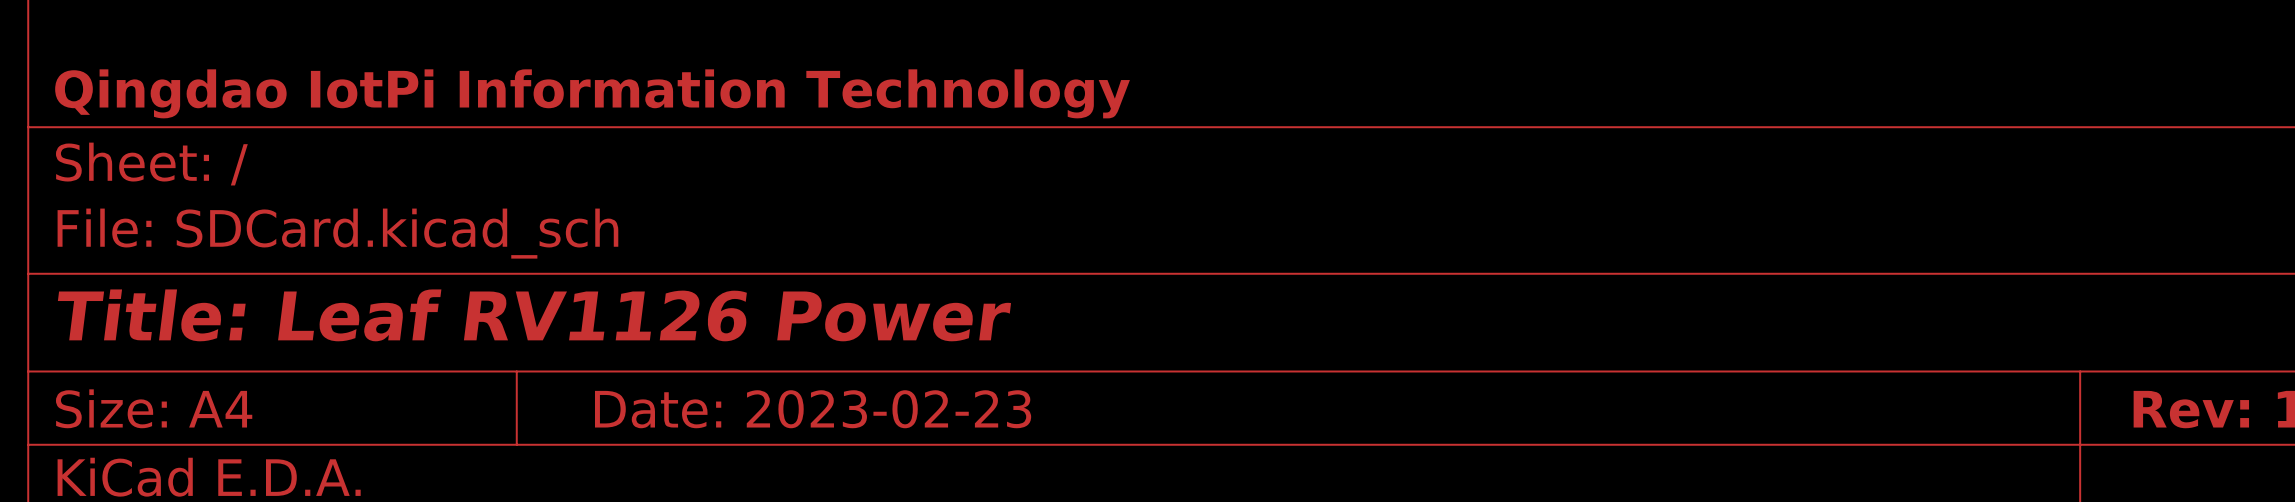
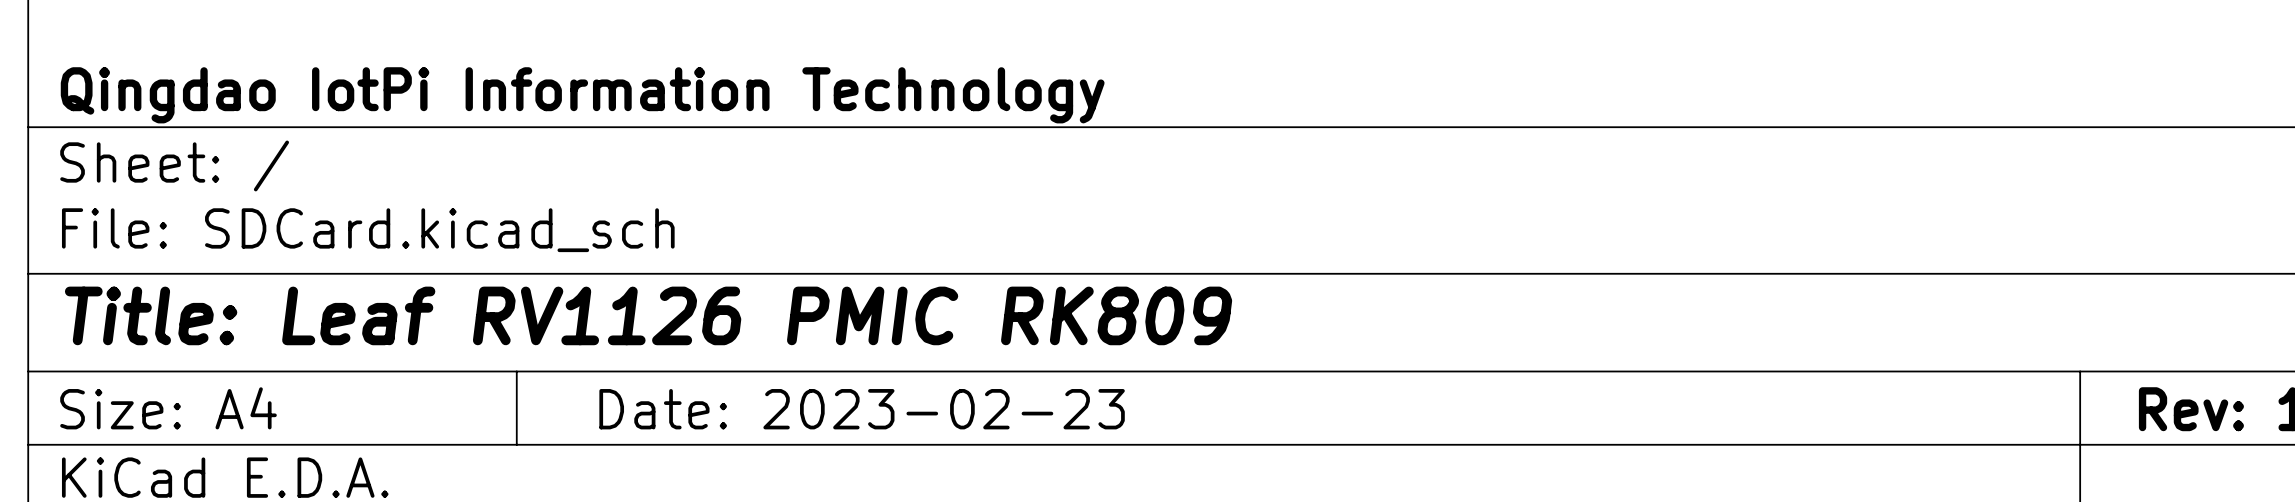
title block: Title: Leaf RV1126 Power (534, 315) -> Title: Leaf RV1126 PMIC RK809 (648, 315)

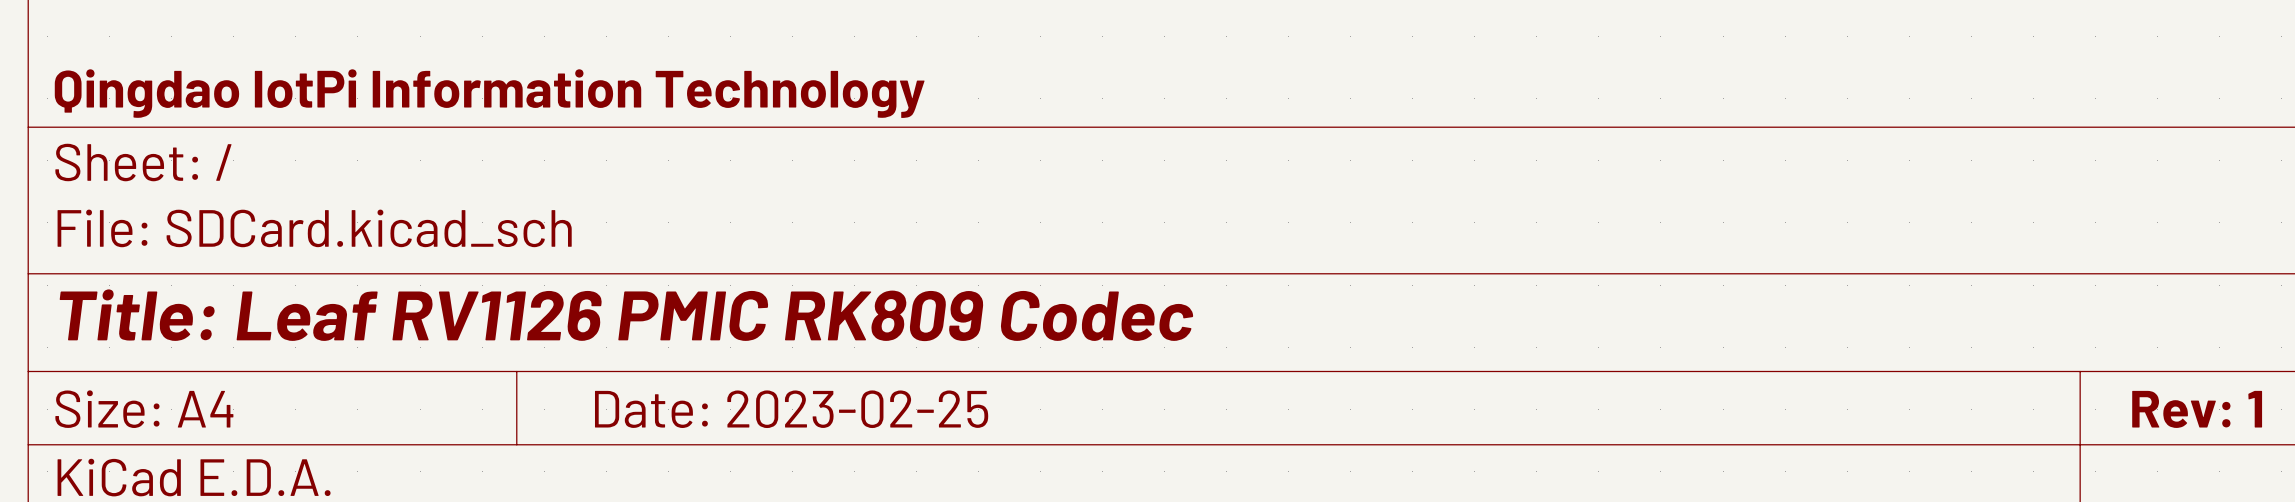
title block: Title: Leaf RV1126 PMIC RK809 (648, 315) -> Title: Leaf RV1126 PMIC RK809 Codec (626, 315)
title block: Date: 2023-02-23 (862, 409) -> Date: 2023-02-25 (791, 409)

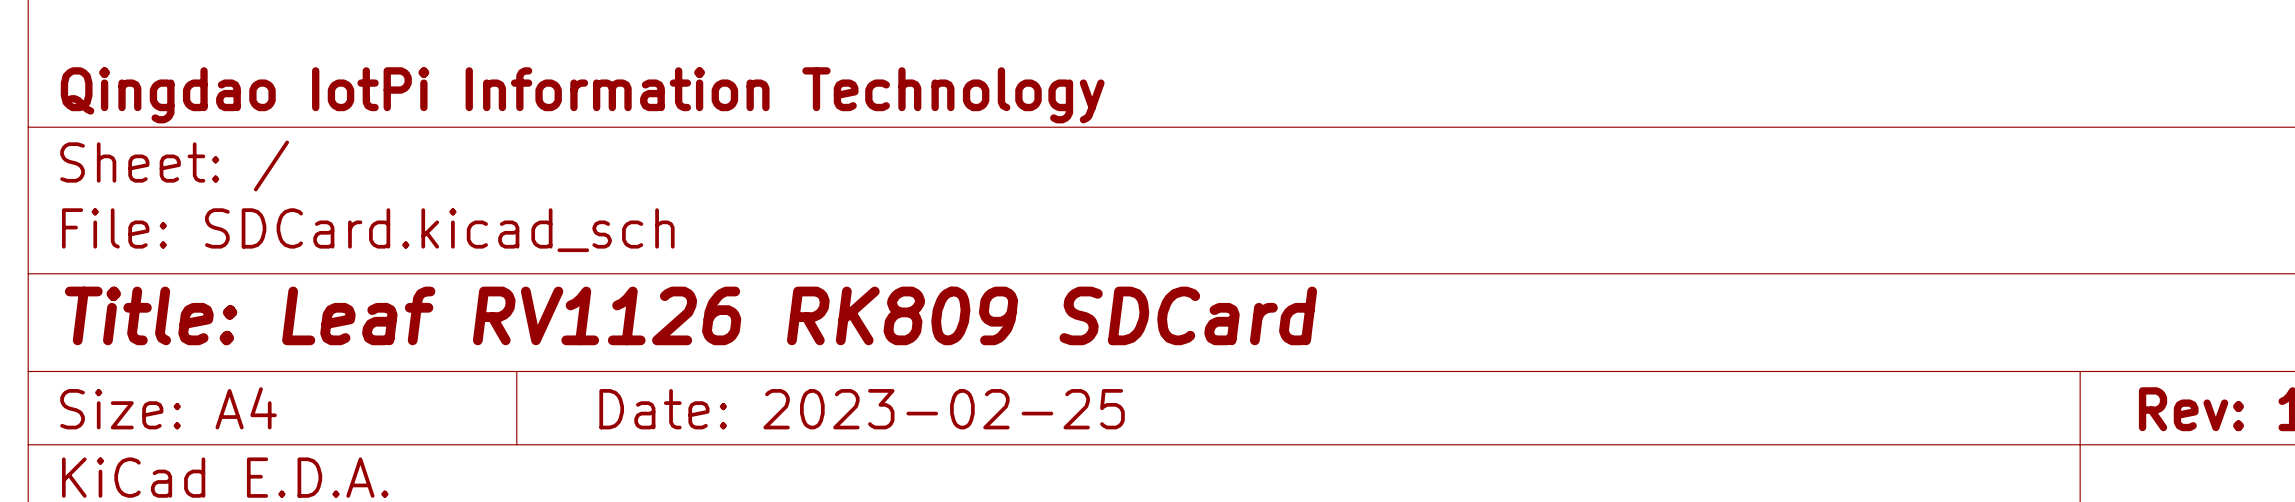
title block: Title: Leaf RV1126 PMIC RK809 Codec (626, 315) -> Title: Leaf RV1126 RK809 SDCard (691, 315)

